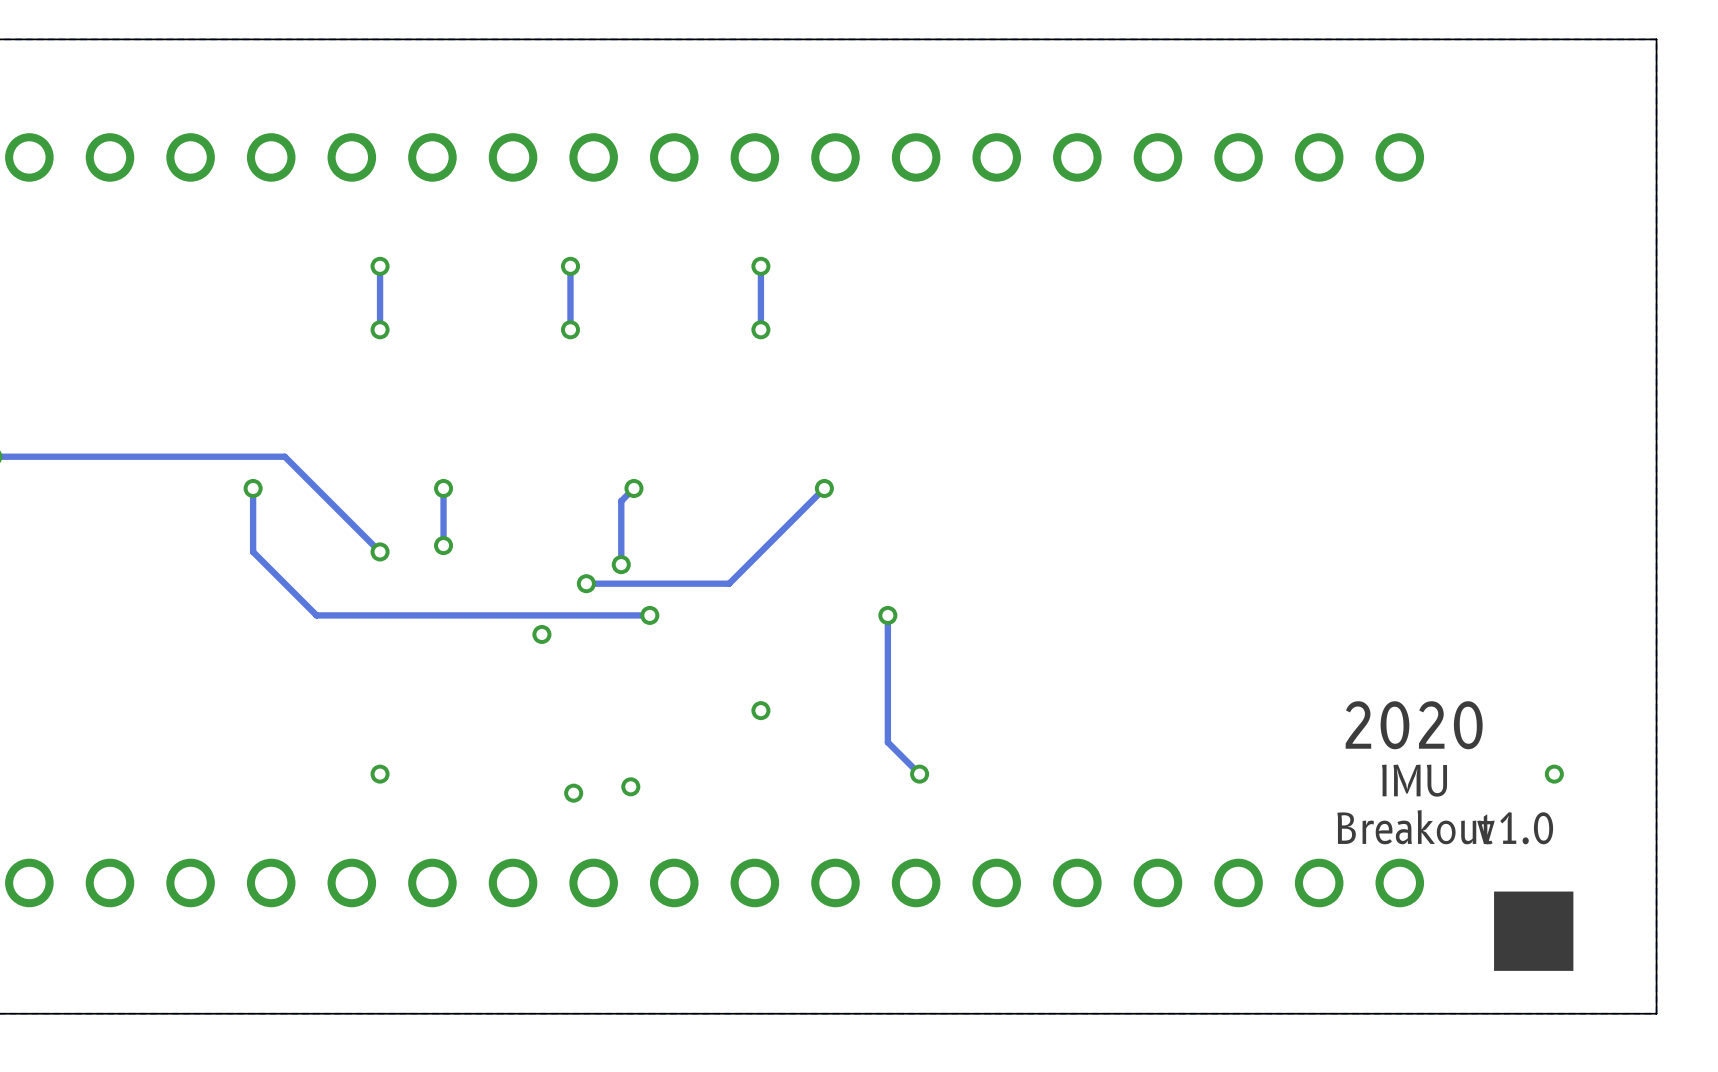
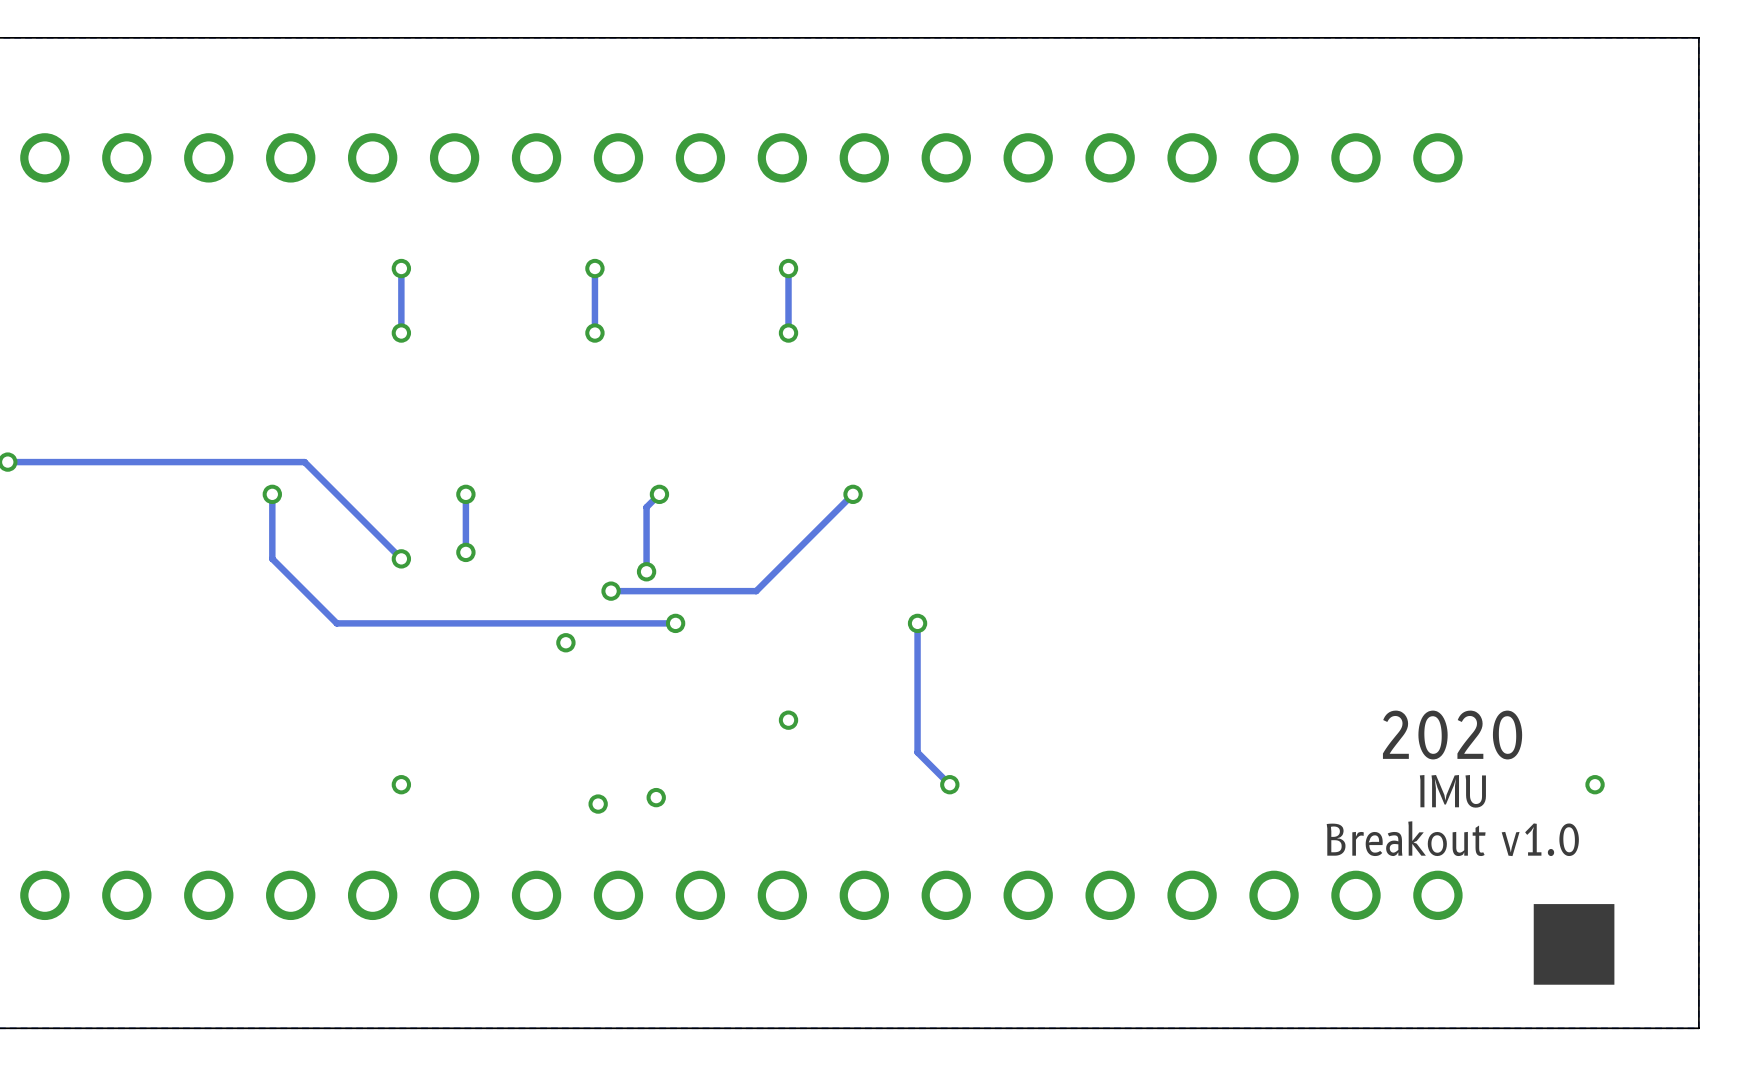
text: Breakout (1415, 827) -> Breakout v1.0 (1452, 838)
text: v1.0 (1515, 828) -> none

